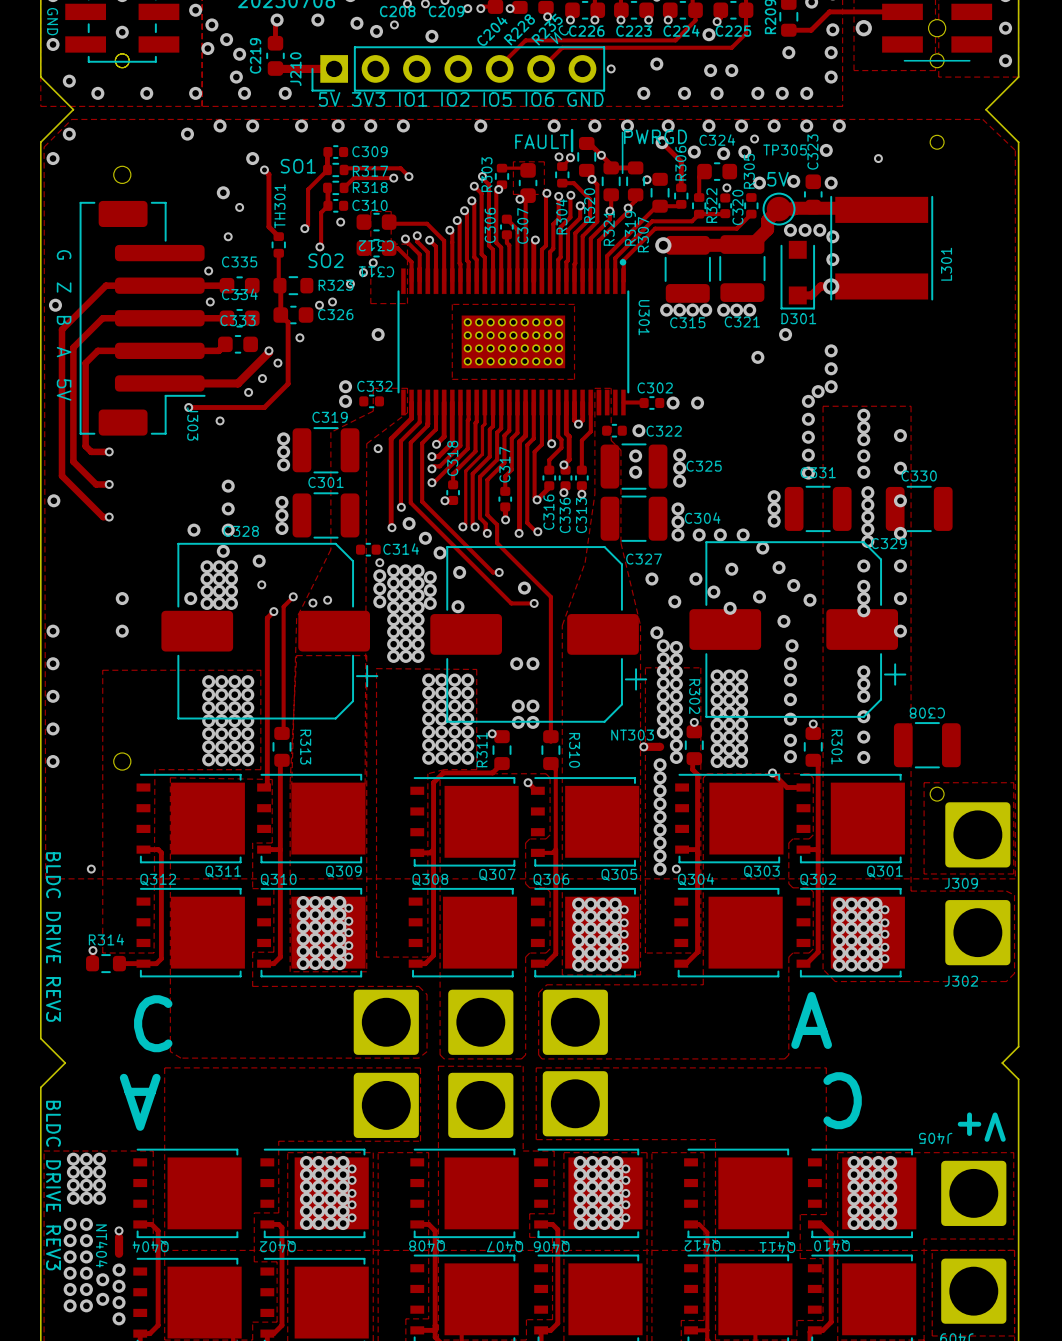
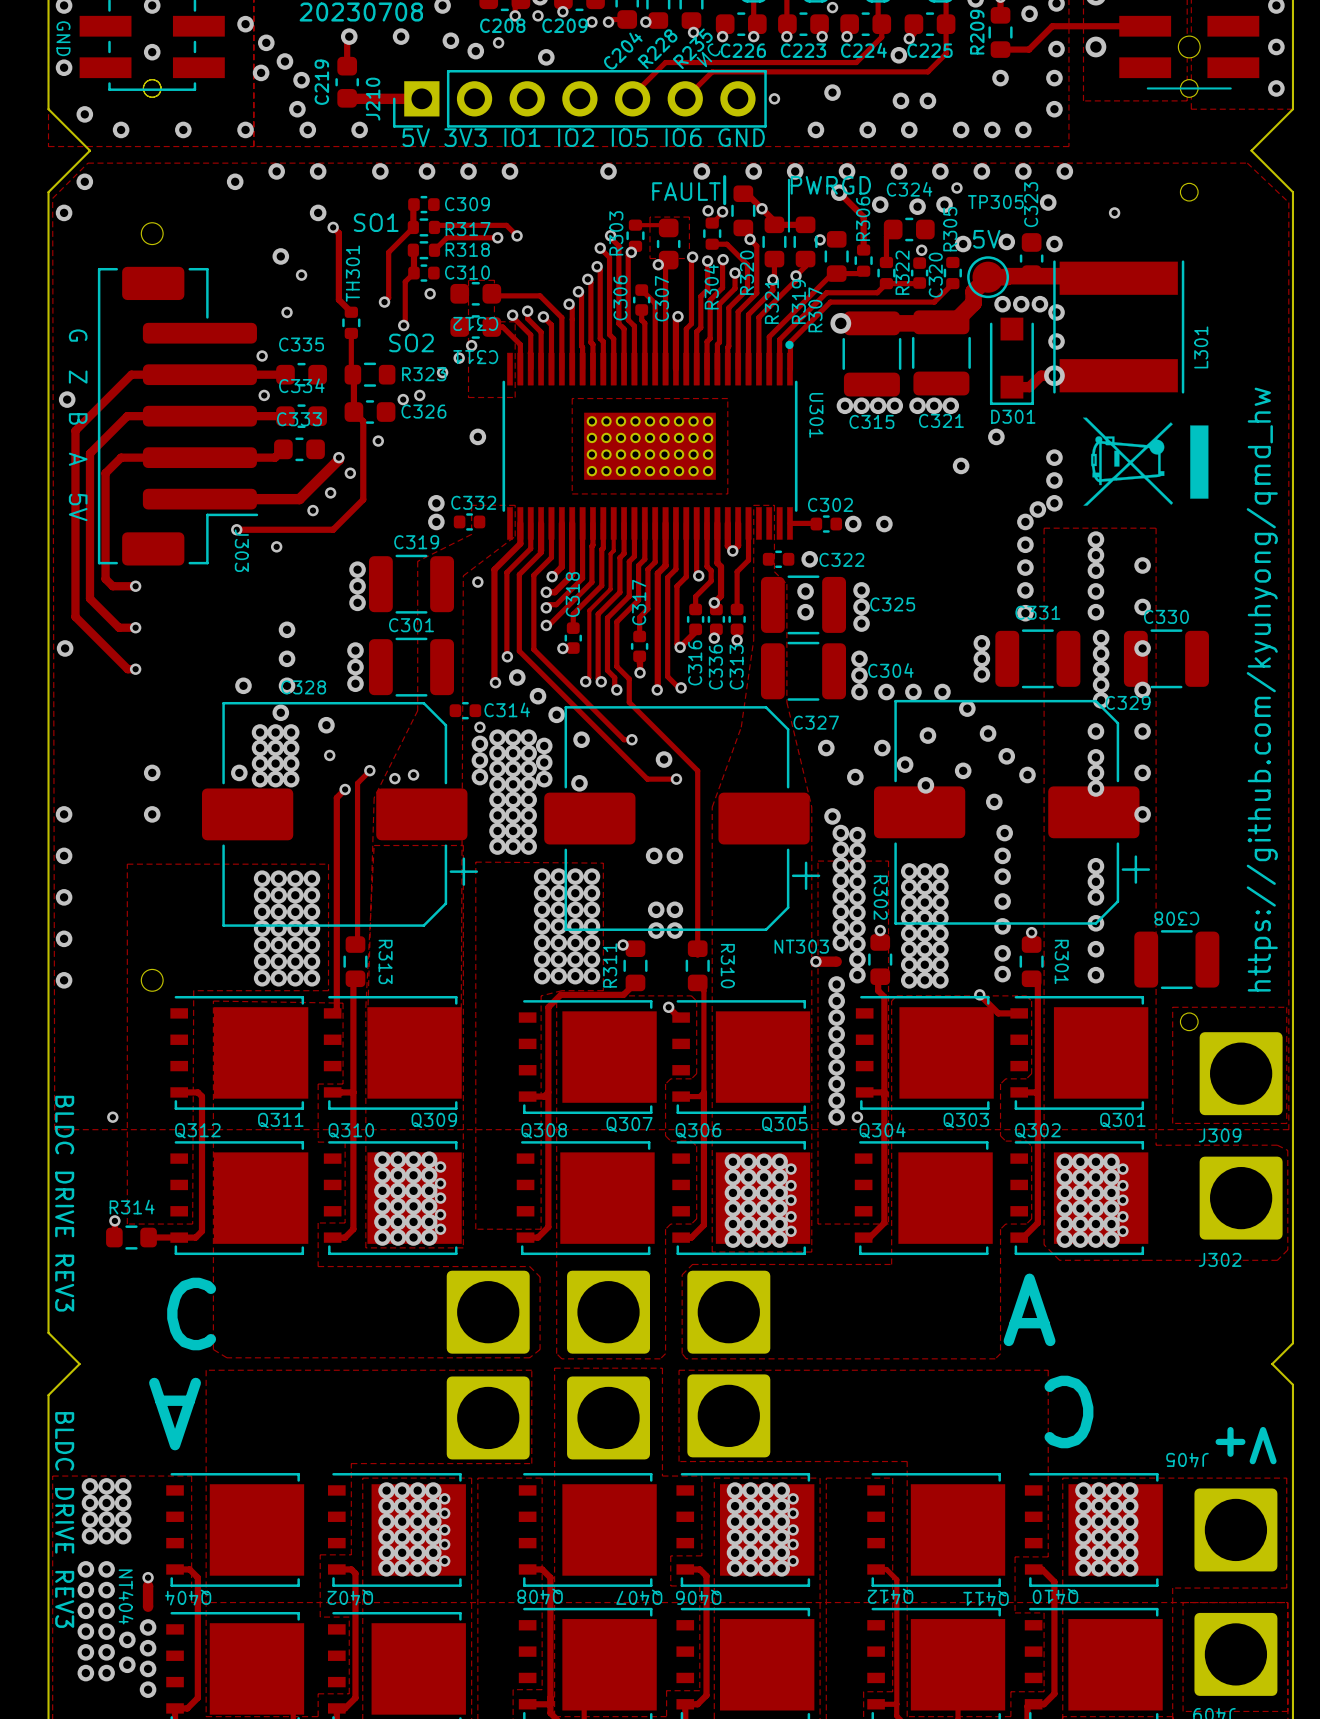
drawing: none -> [1082, 417, 1209, 506]
text: none -> https://github.com/kyuhyong/qmd_hw (1262, 689)

